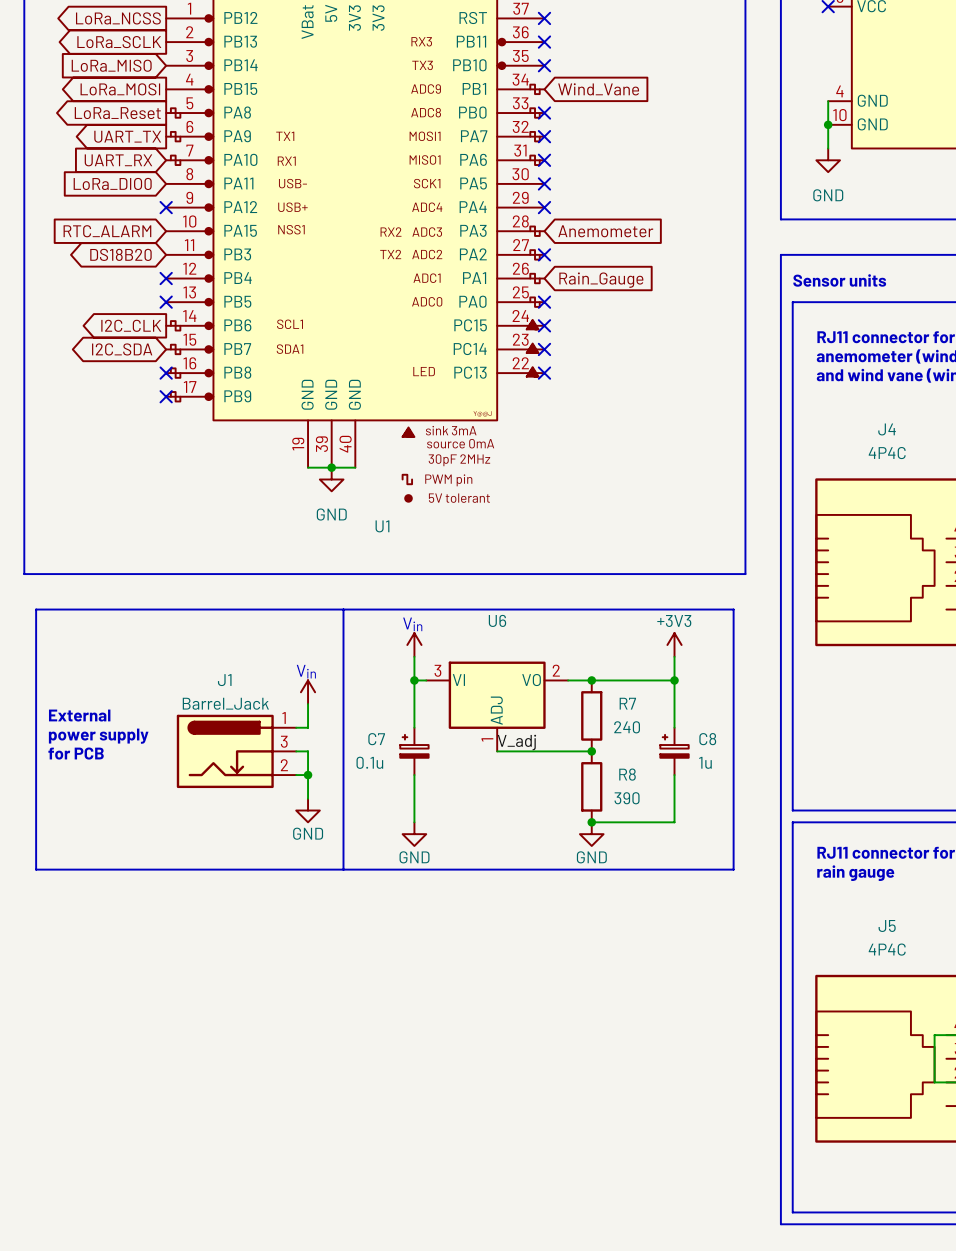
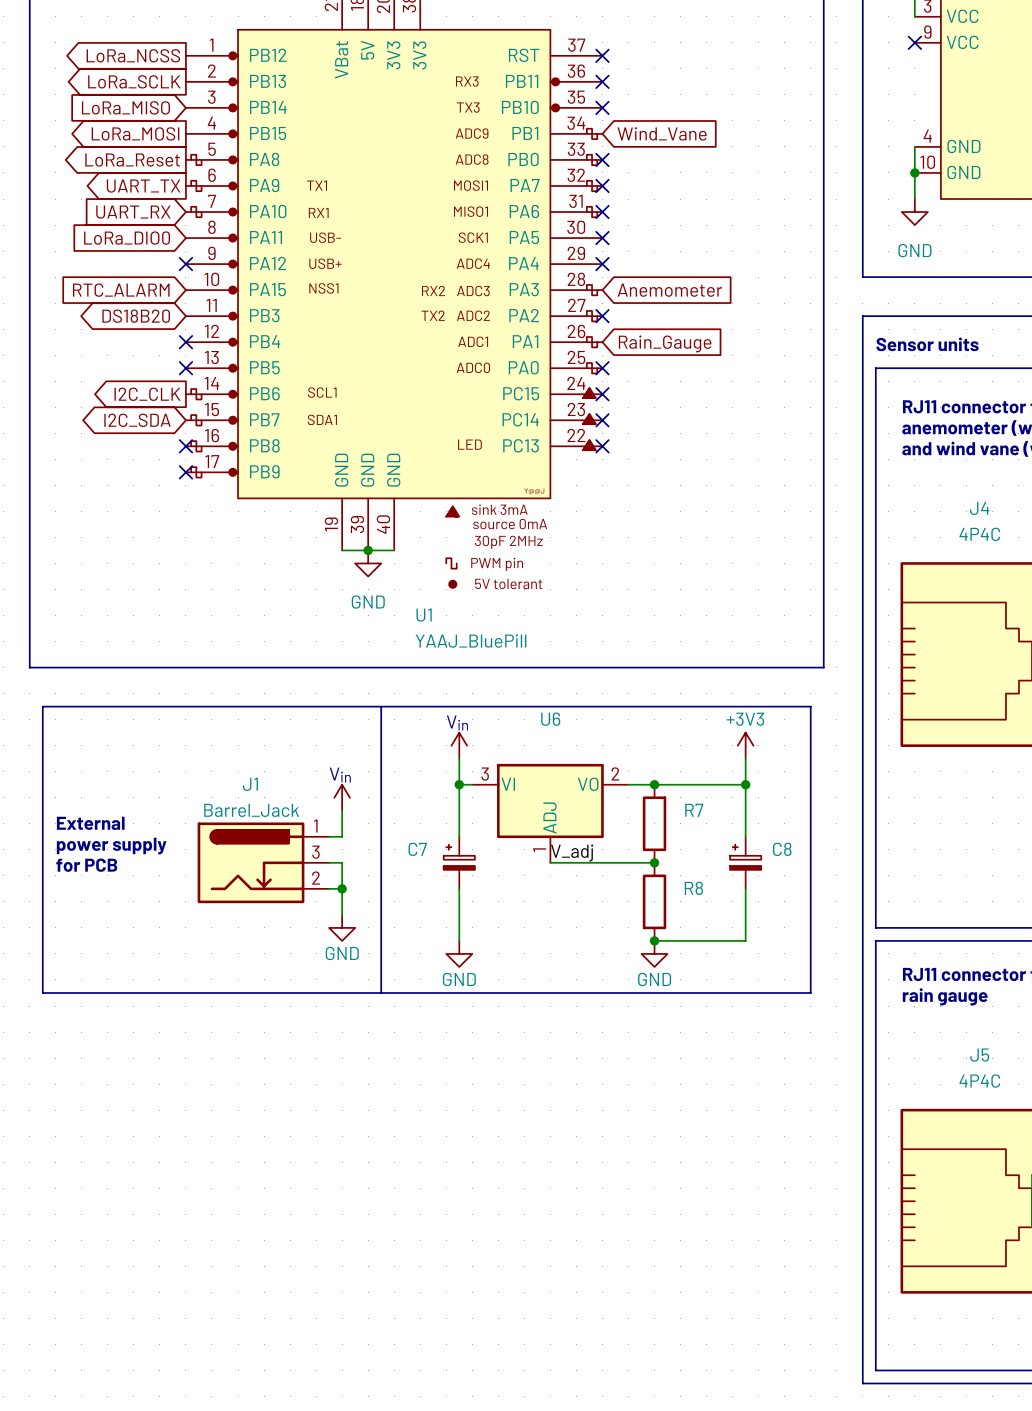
U1 value: none -> YAAJ_BluePill (470, 641)
R7 value: 240 (627, 727) -> none
C7 value: 0.1u (369, 762) -> none
C8 value: 1u (705, 762) -> none
R8 value: 390 (627, 798) -> none

